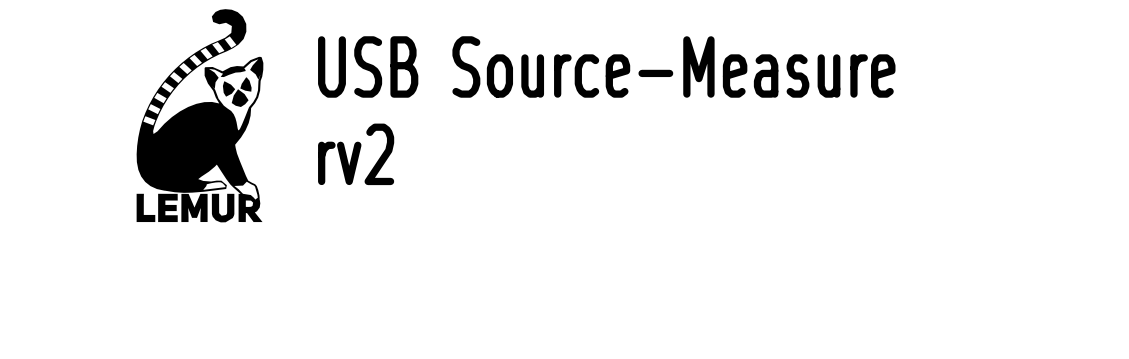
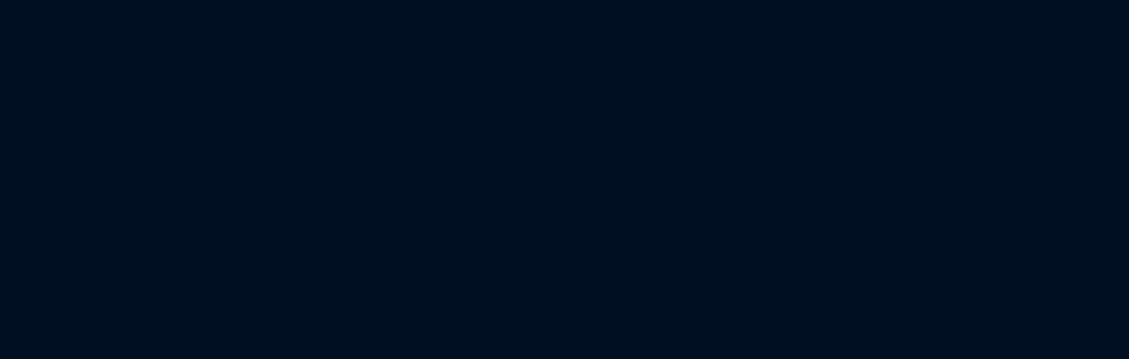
drawing: [136, 9, 264, 223] -> none
text: USB Source-Measure (606, 66) -> none
text: rv2 (356, 154) -> none

